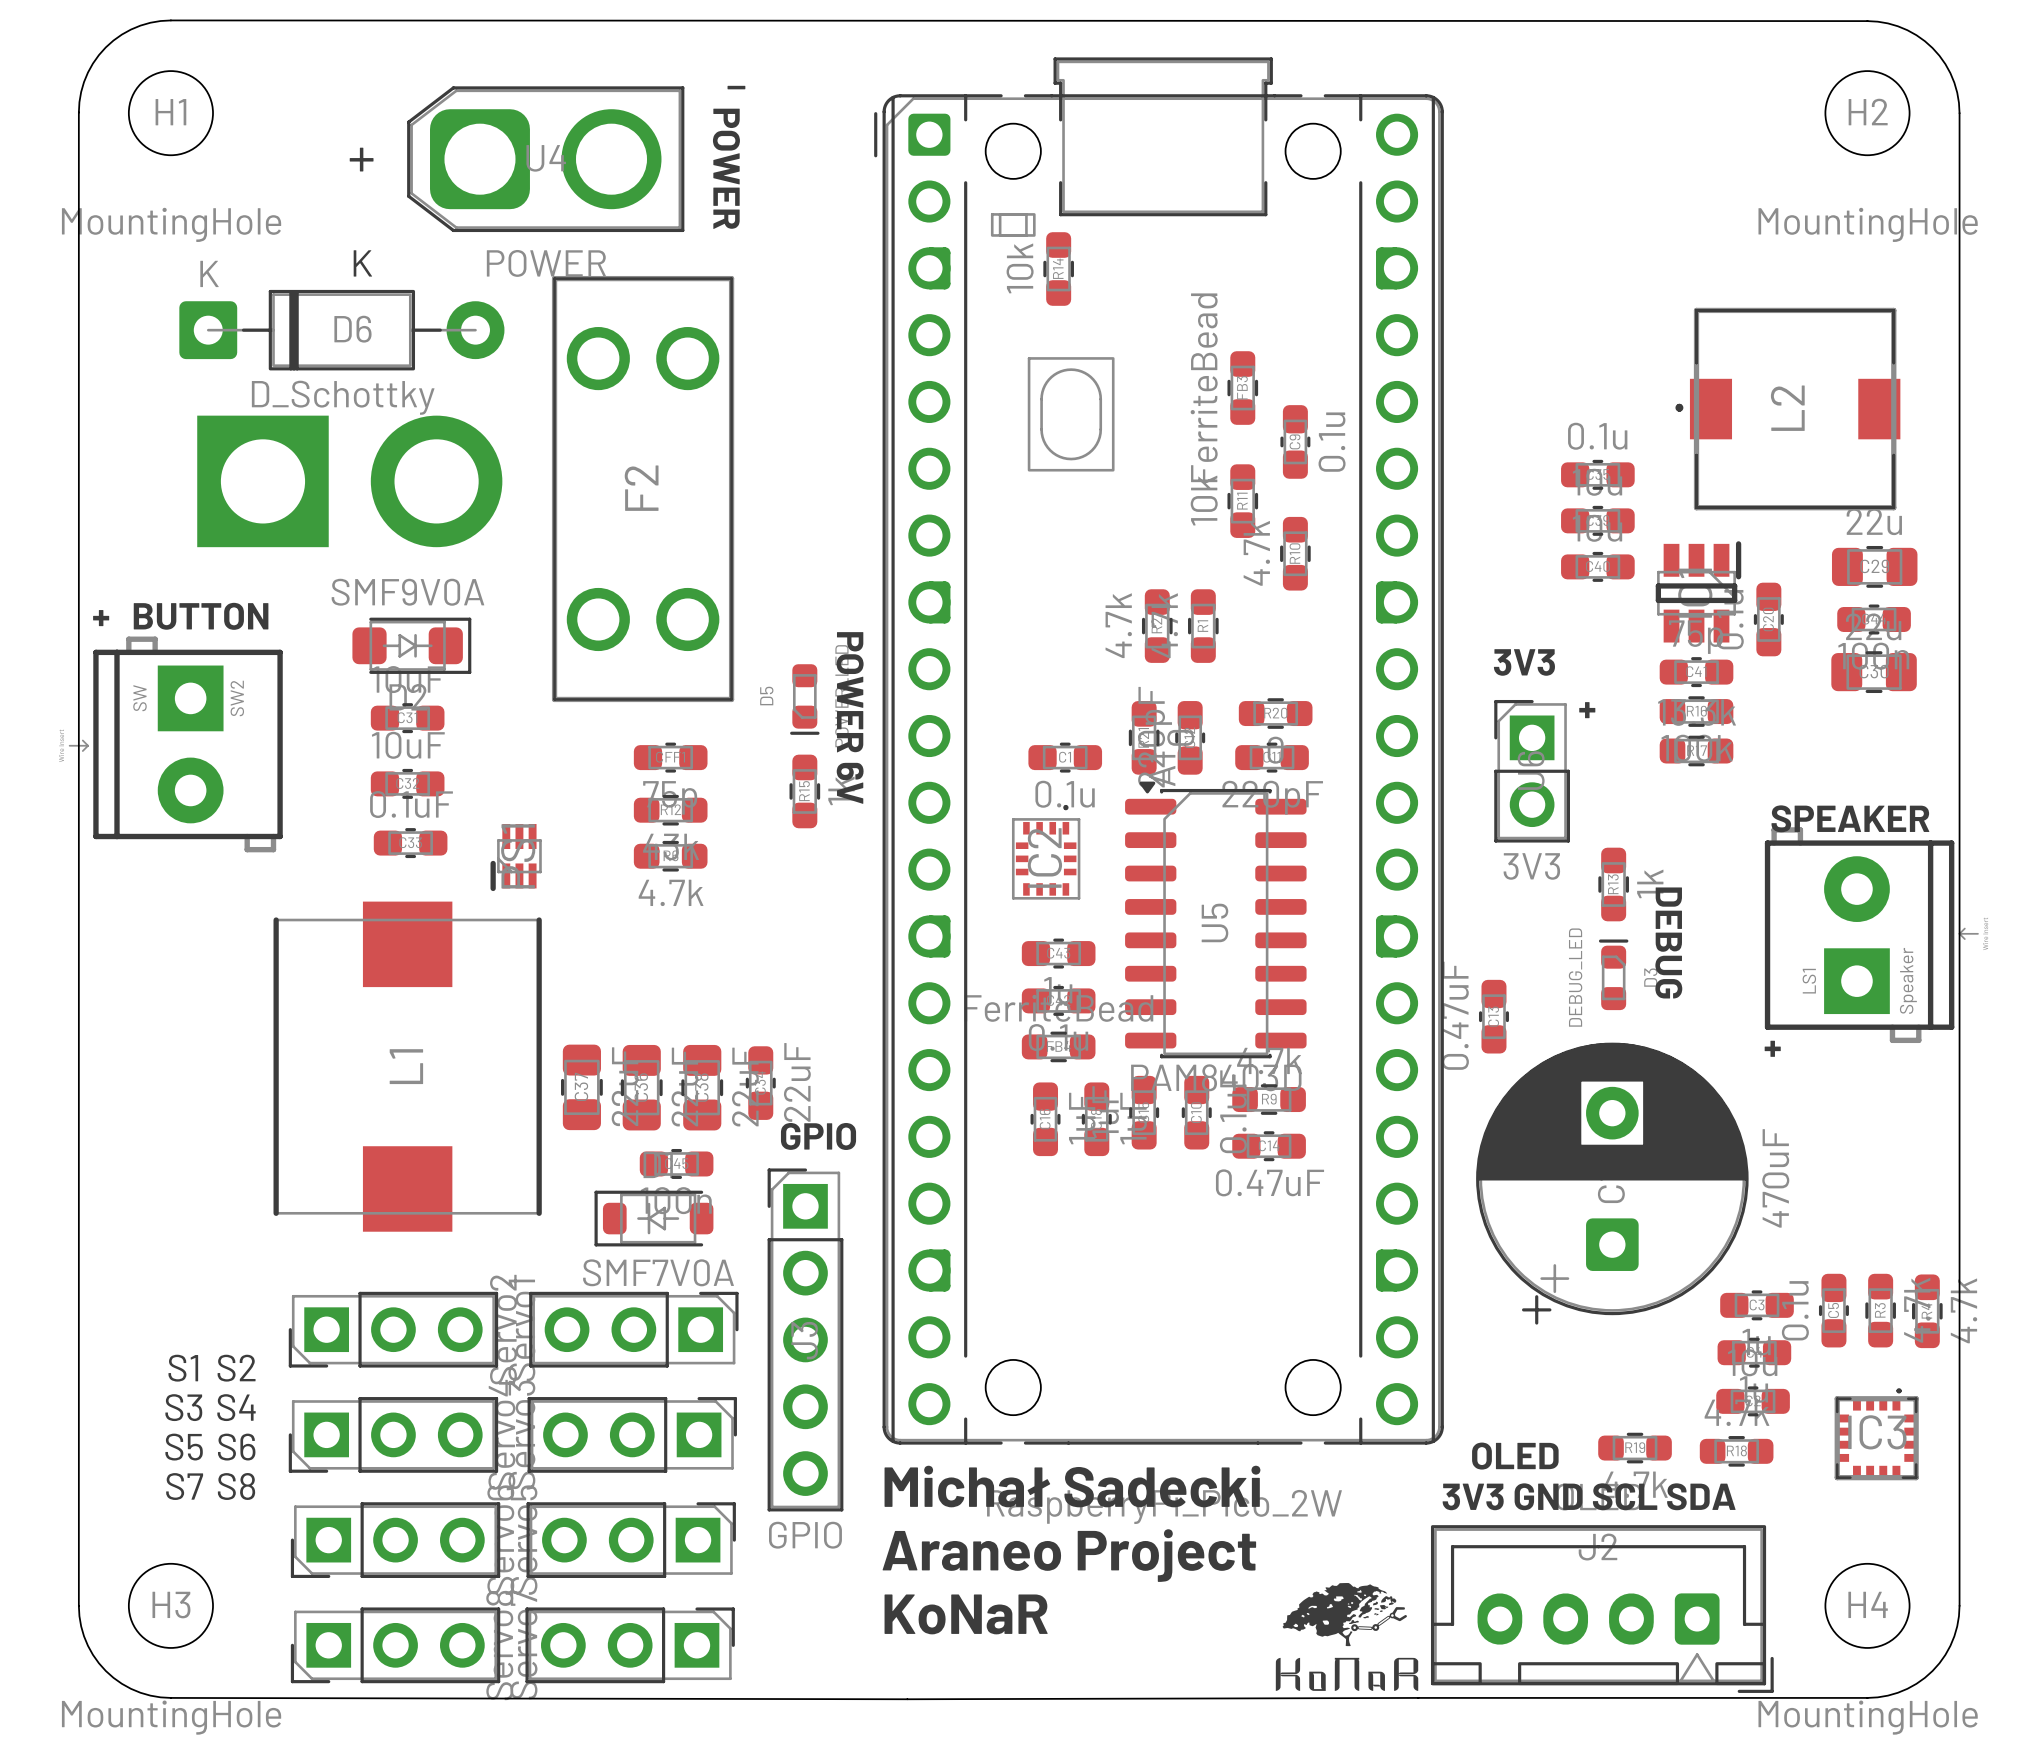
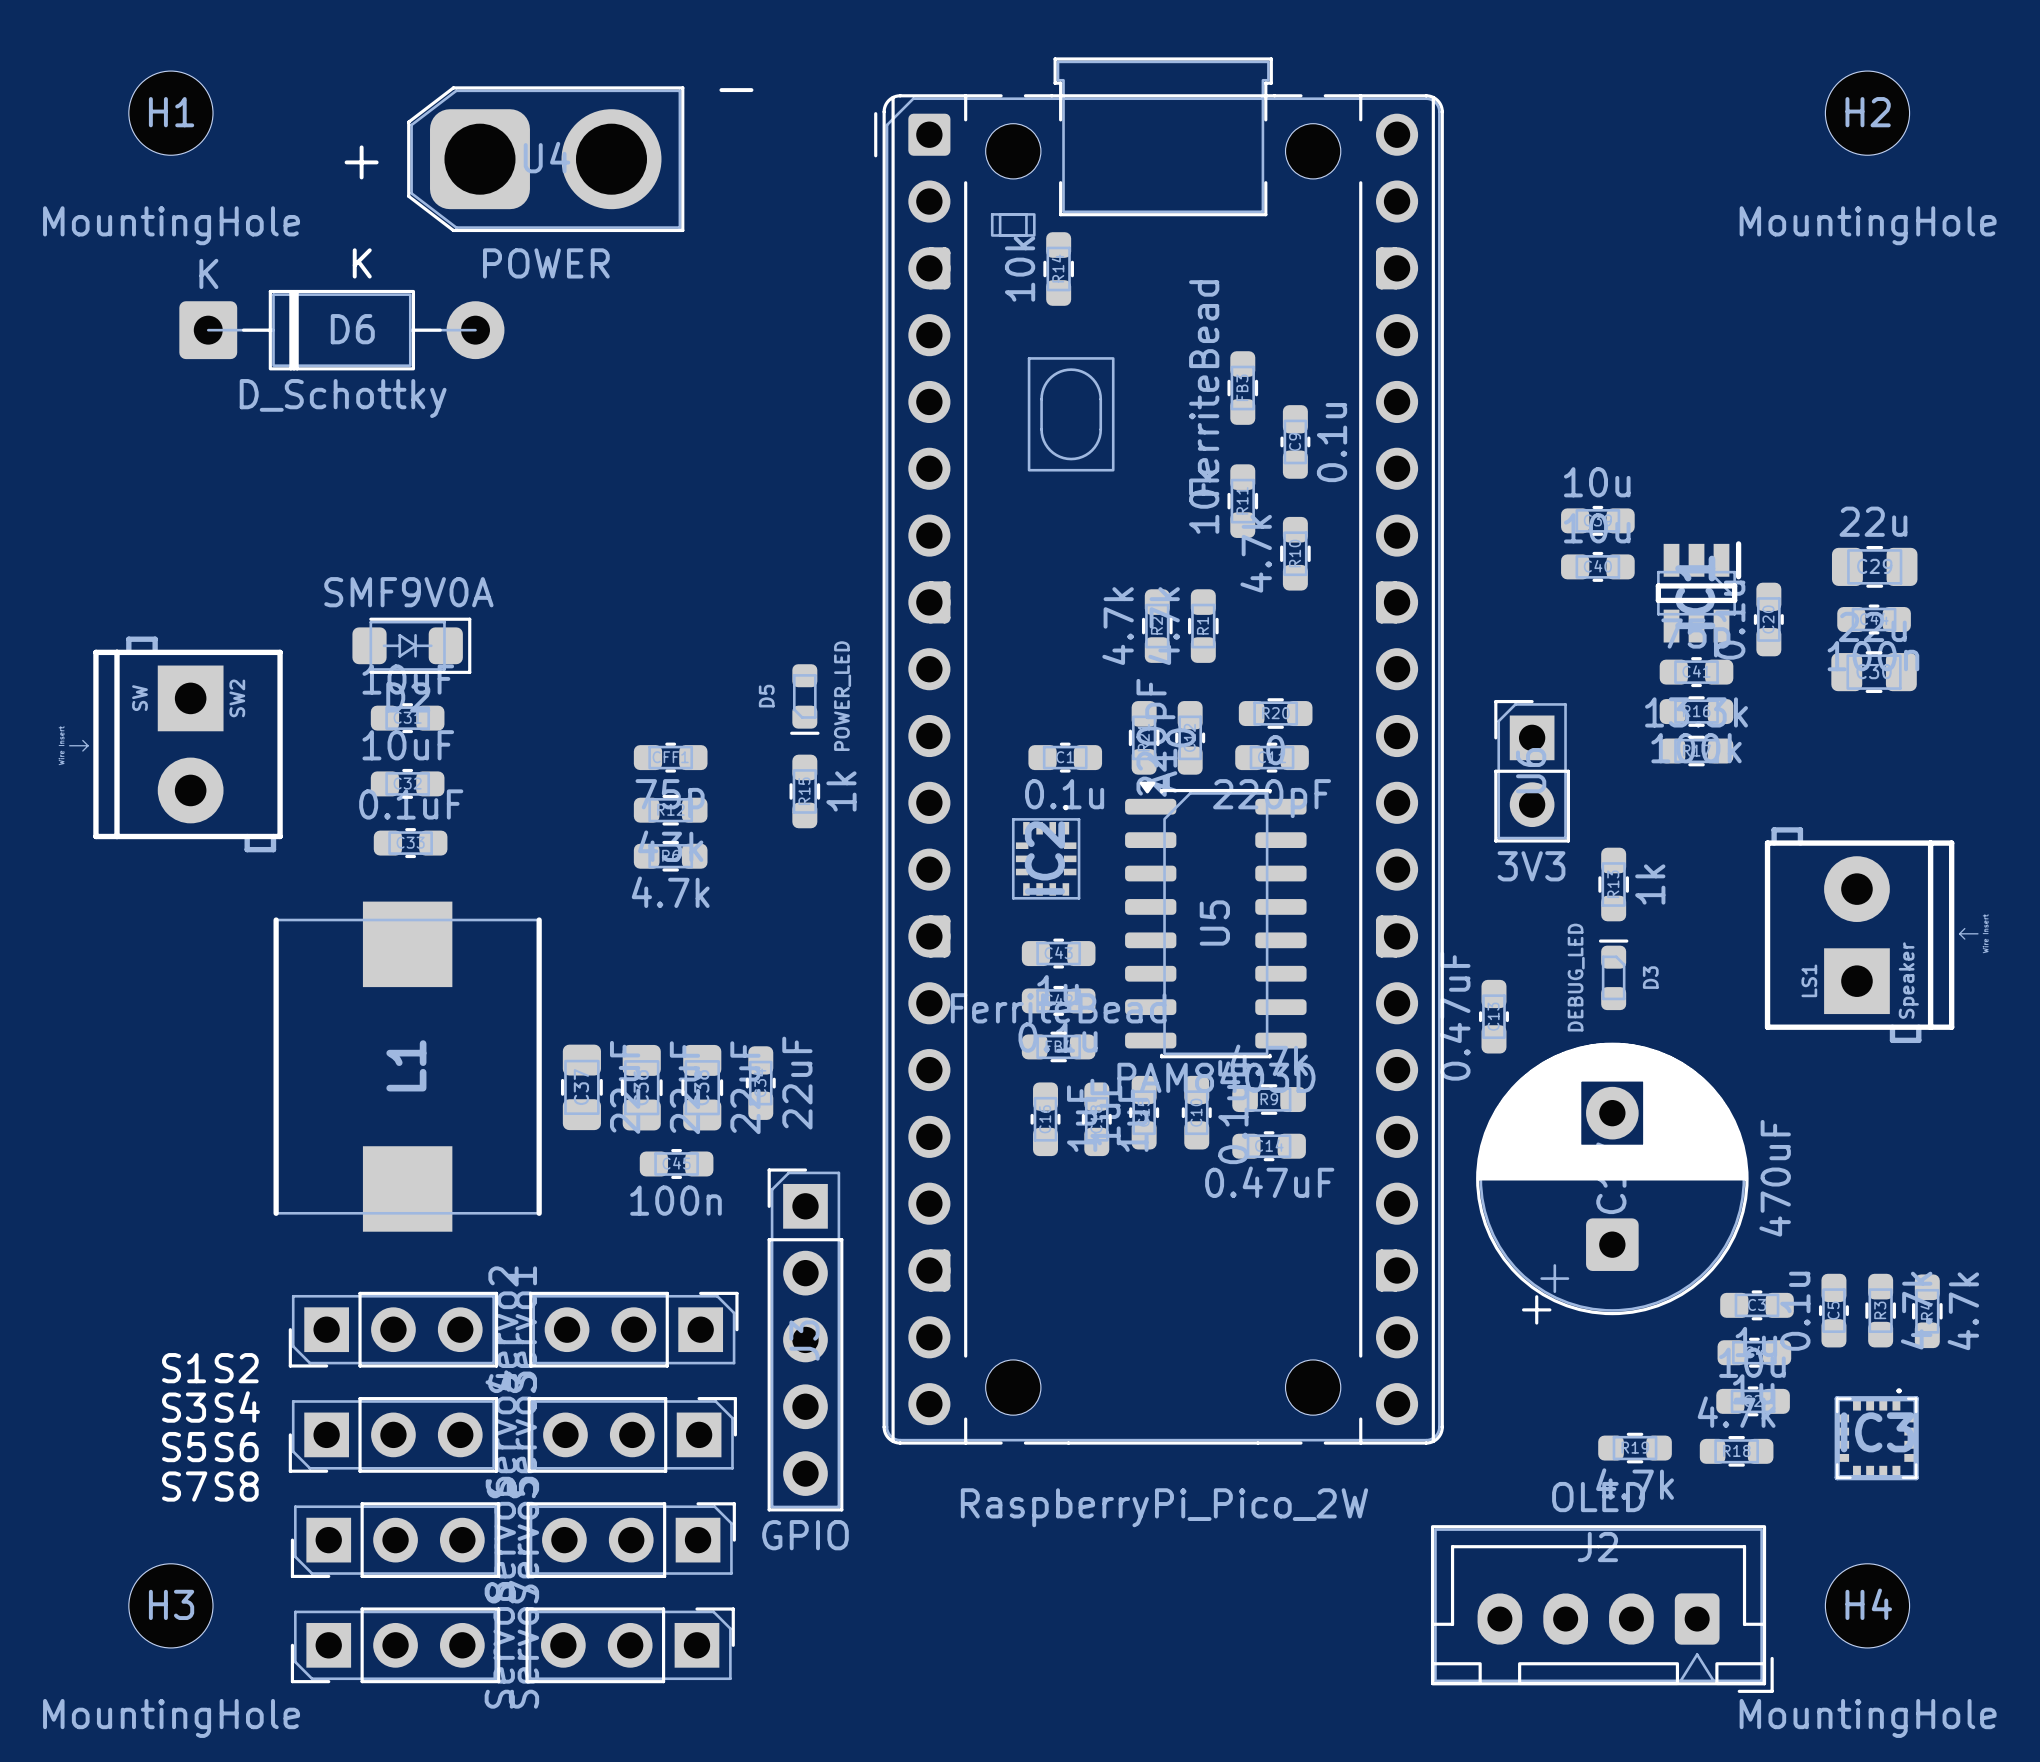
board edge: (170, 20) (1867, 21) (1887, 23) (1907, 30) (1932, 48) (1945, 64) (1954, 82) (1959, 113) (1959, 1605) (1957, 1626) (1950, 1645) (1932, 1670) (1916, 1683) (1897, 1692) (1867, 1697) (907, 1699) (170, 1697) (150, 1695) (130, 1688) (105, 1670) (92, 1654) (84, 1636) (78, 1605) (78, 112) (84, 82) (92, 63) (105, 47) (130, 29) (150, 22) (170, 20) -> none
text: POWER (726, 168) -> none
L2: (1787, 409) -> none
part: 0.1u (1597, 474) -> none
part: (349, 481) -> none
F2: (643, 489) -> none
text: BUTTON (201, 616) -> none
text: + (101, 618) -> none
text: 3V3 (1524, 662) -> none
text: + (1587, 710) -> none
text: POWER 6V (850, 718) -> none
text: SPEAKER (1850, 818) -> none
part: (516, 857) -> none
text: DEBUG (1668, 942) -> none
text: + (1772, 1048) -> none
text: GPIO (818, 1136) -> none
part: SMF7V0A (653, 1218) -> none
text: OLED (1515, 1456) -> none
text: Michał Sadecki (1072, 1486) -> none
text: 3V3 GND SCL SDA (1589, 1496) -> none
text: Araneo Project (1069, 1555) -> none
drawing: [1275, 1583, 1419, 1691] -> none
text: KoNaR (966, 1614) -> none

